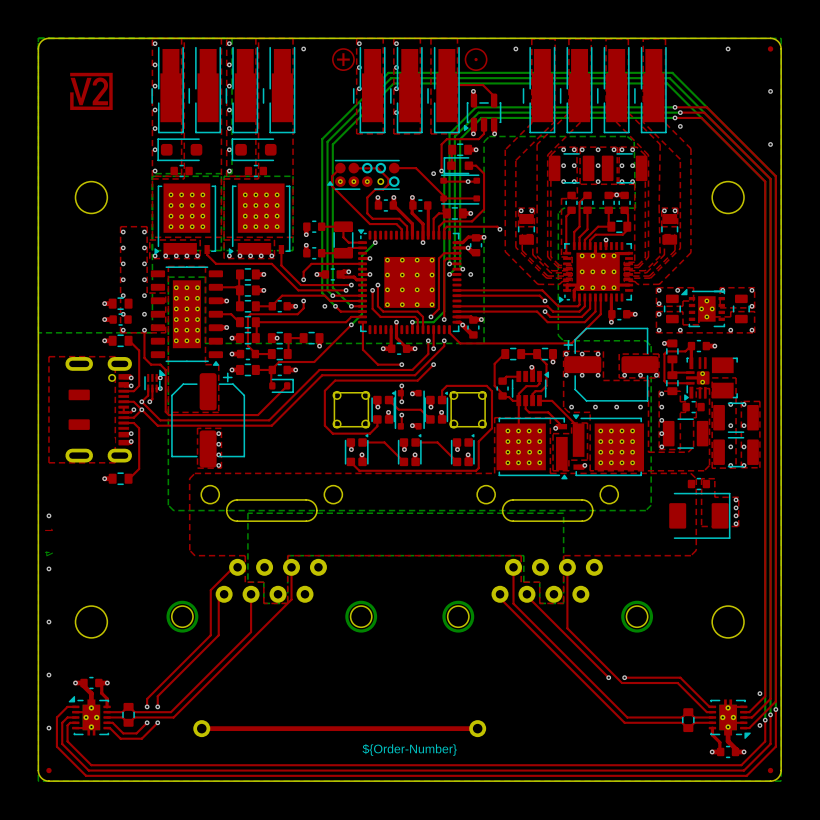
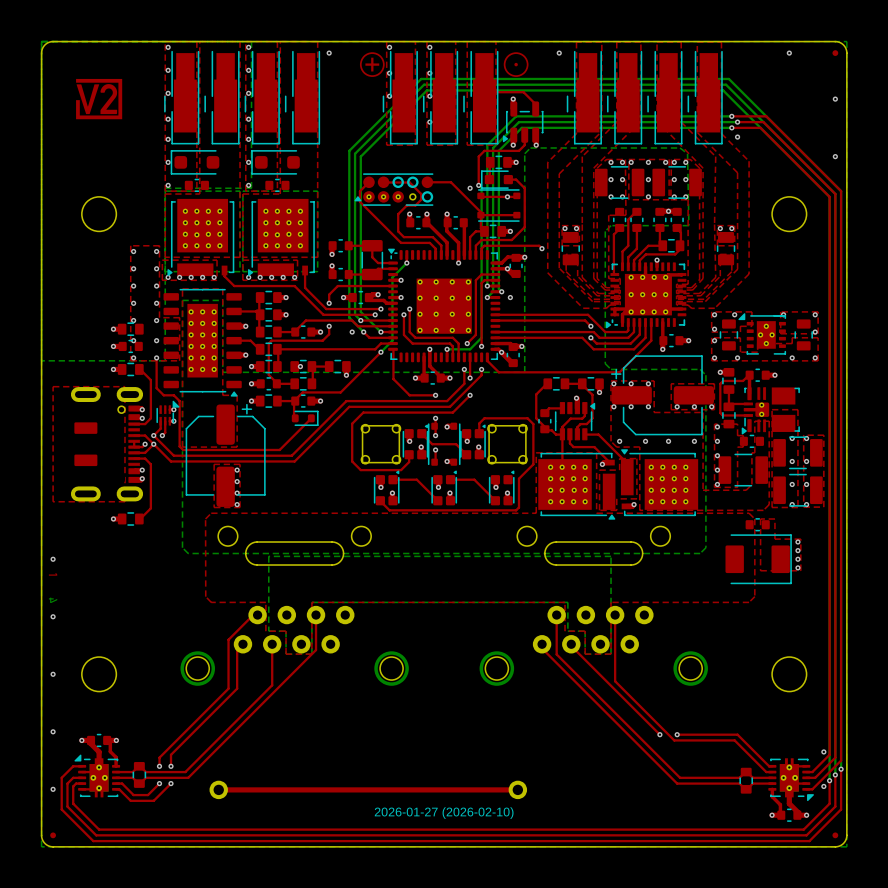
drawing shape: [362, 744, 457, 756] -> [374, 807, 514, 819]

